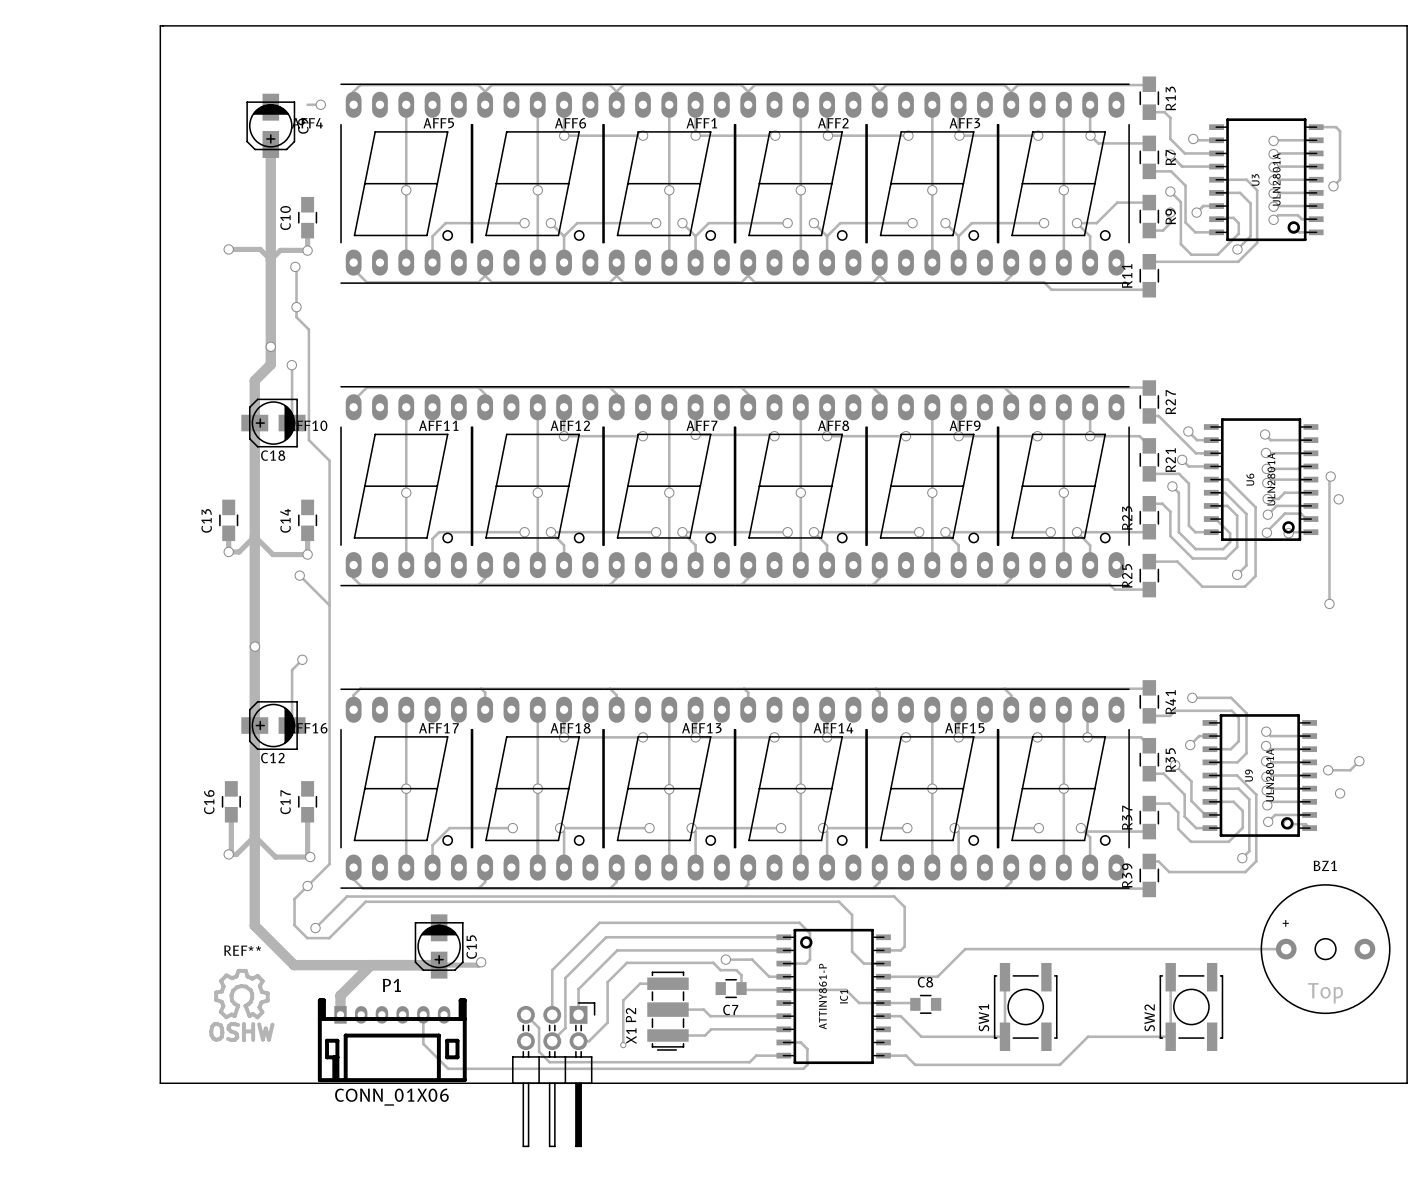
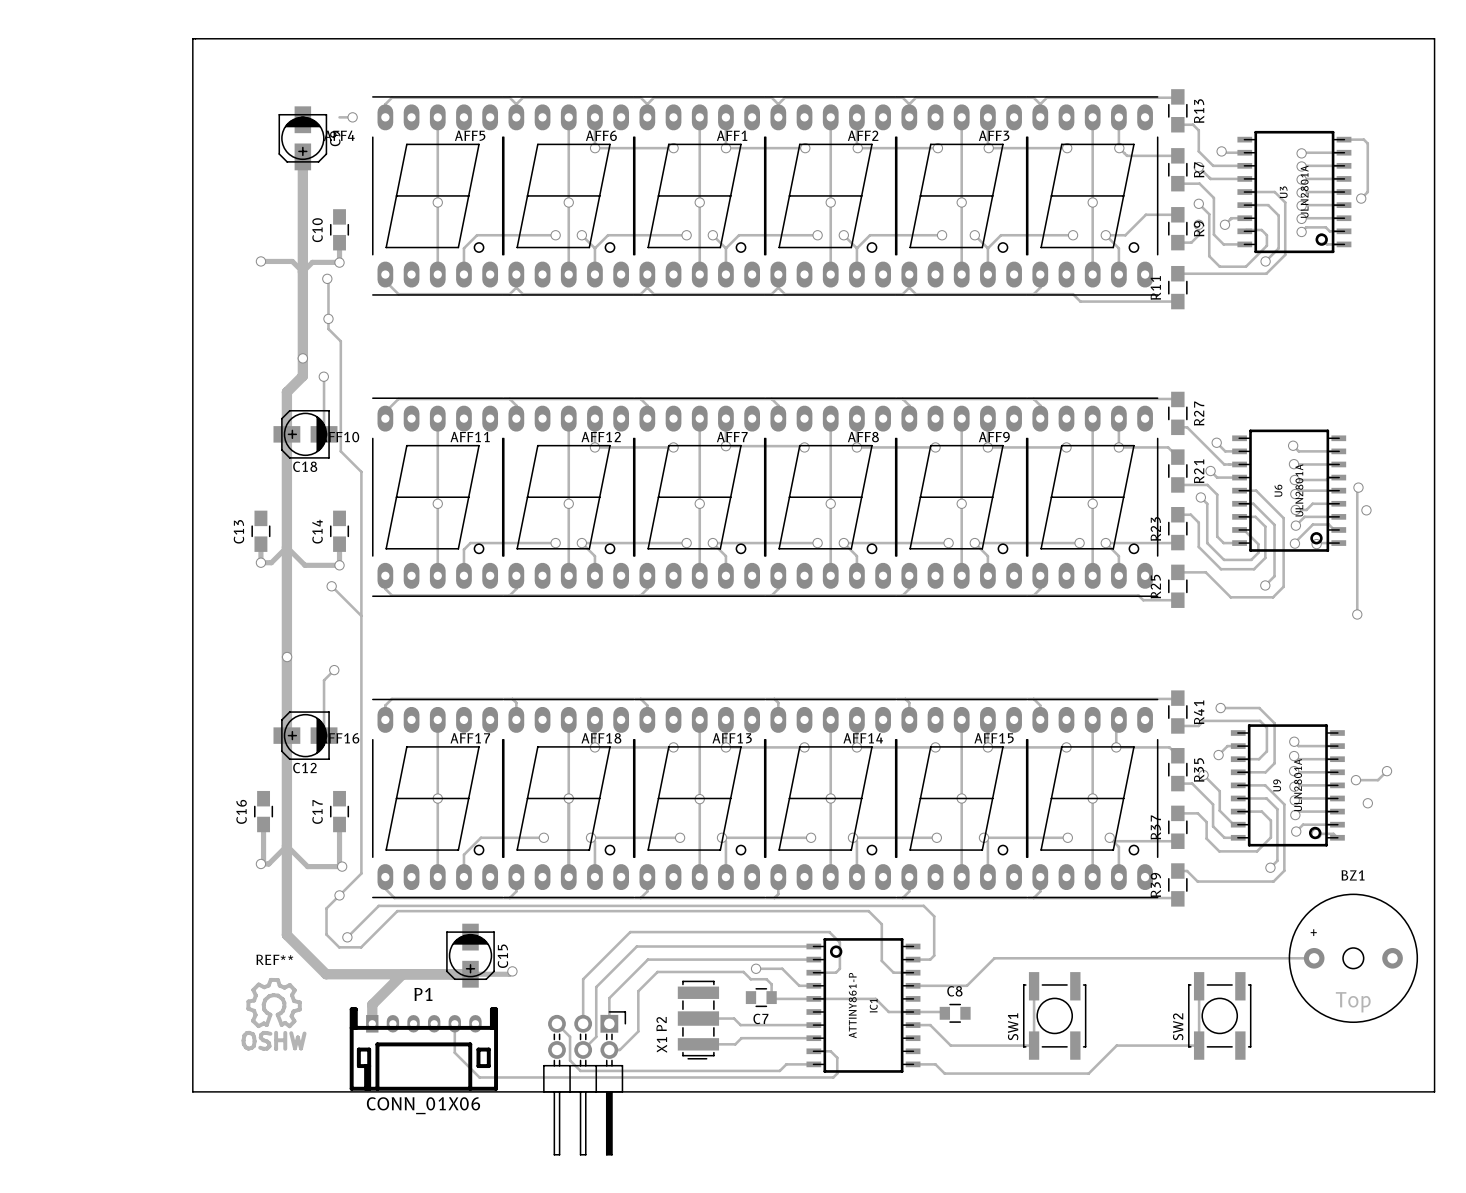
track: (667, 983) (640, 983) (623, 1000) (623, 1045) -> none
via: (623, 1045) -> none

